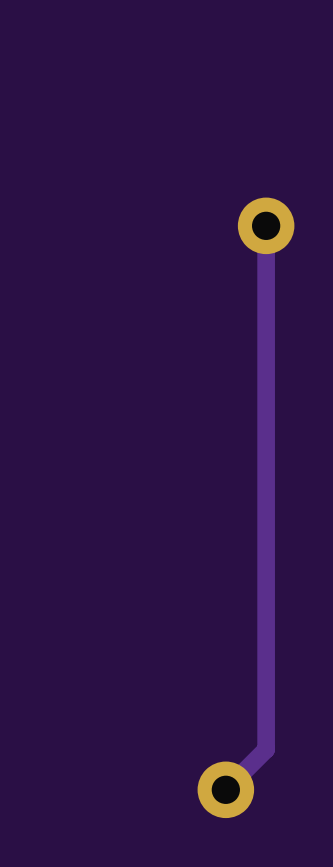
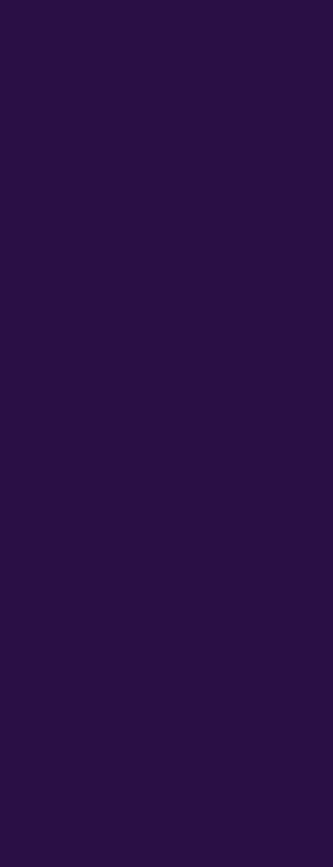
track: (266, 225) (266, 749) (225, 789) -> none
via: (266, 225) -> none
via: (225, 789) -> none

